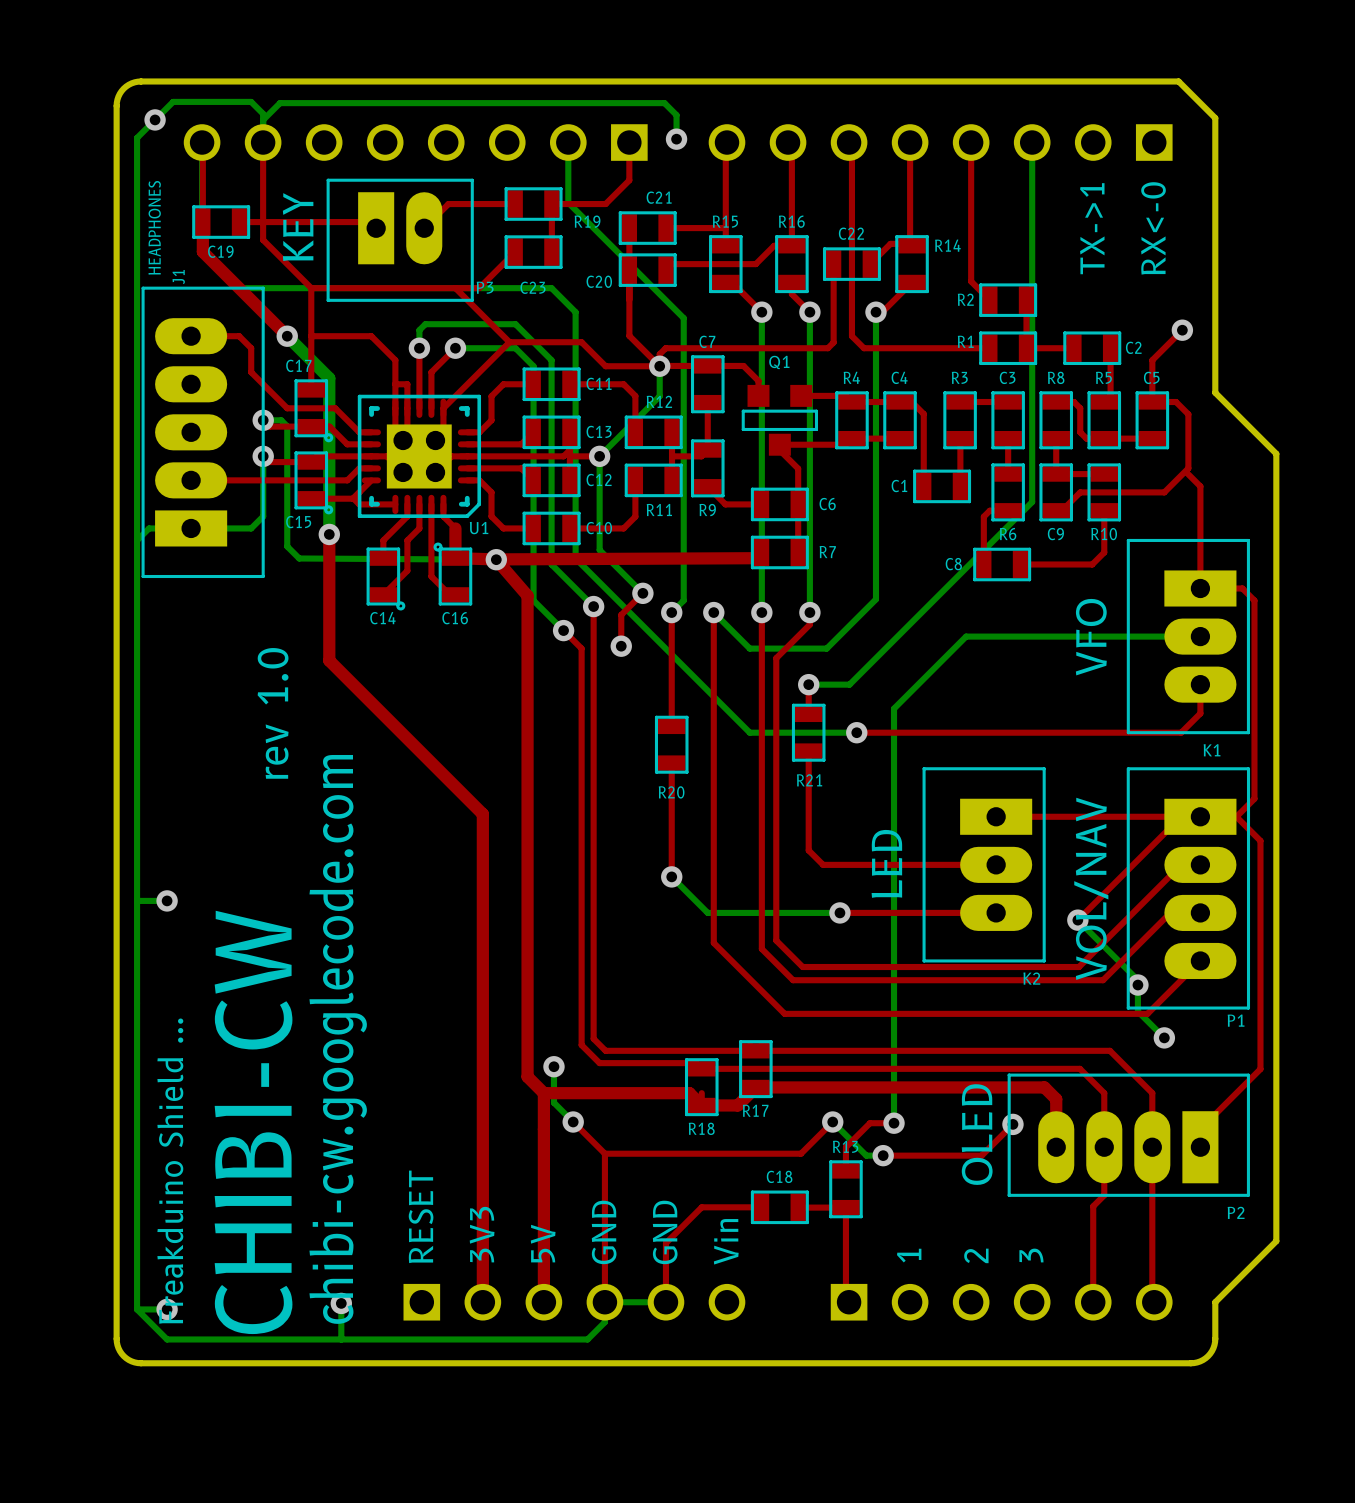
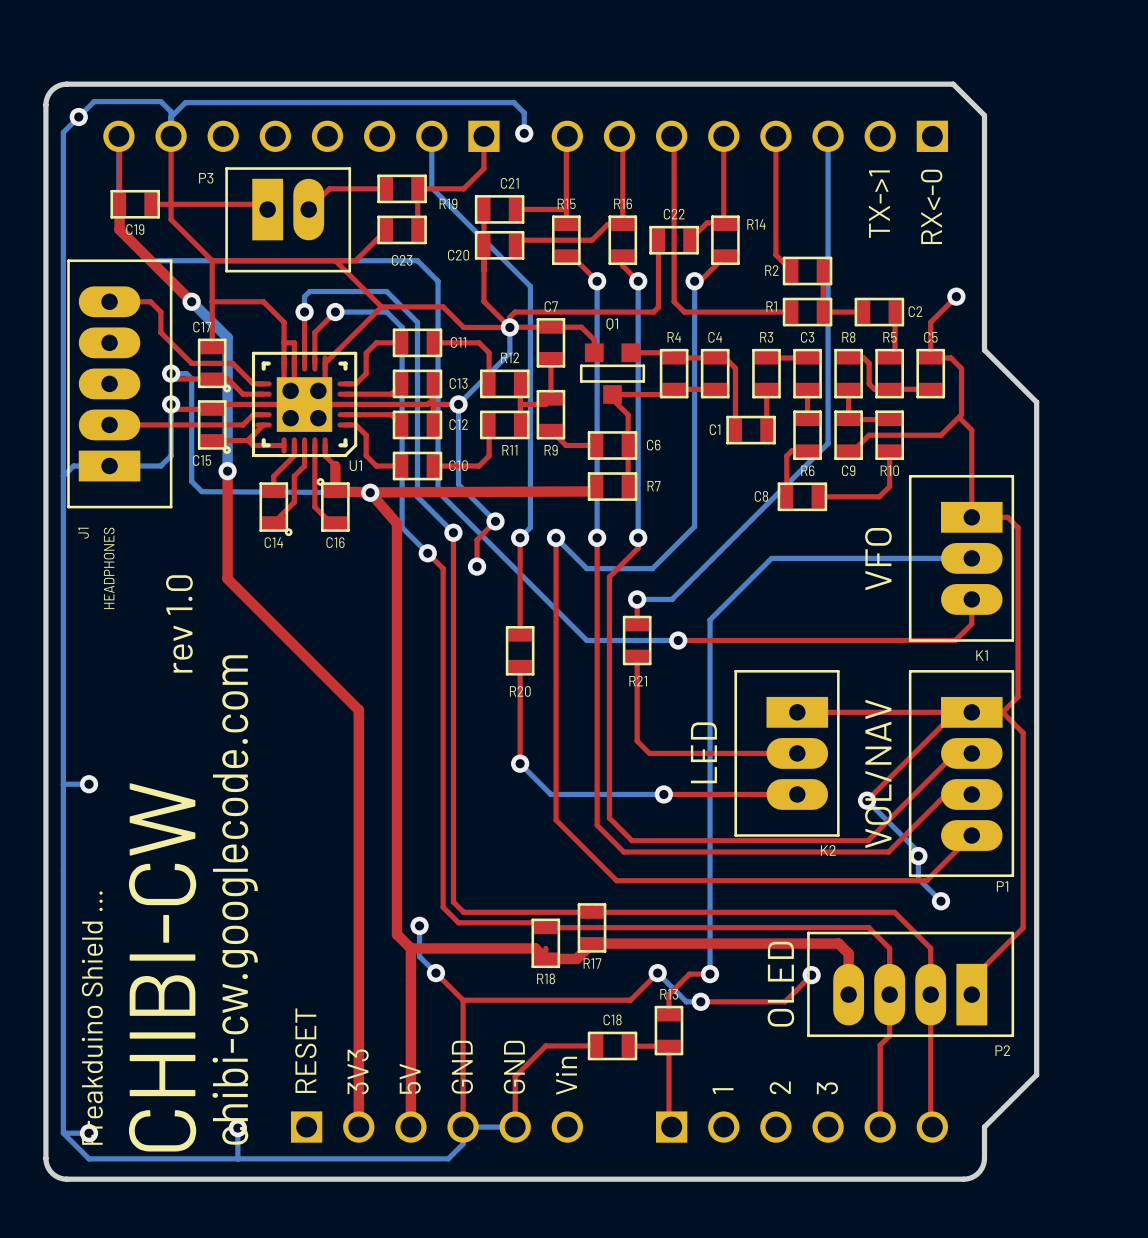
J1 value position: HEADPHONES (154, 227) -> HEADPHONES (109, 568)
text: KEY (298, 227) -> none
J1 name position: J1 (178, 277) -> J1 (83, 533)
P3 name position: P3 (485, 287) -> P3 (206, 178)

